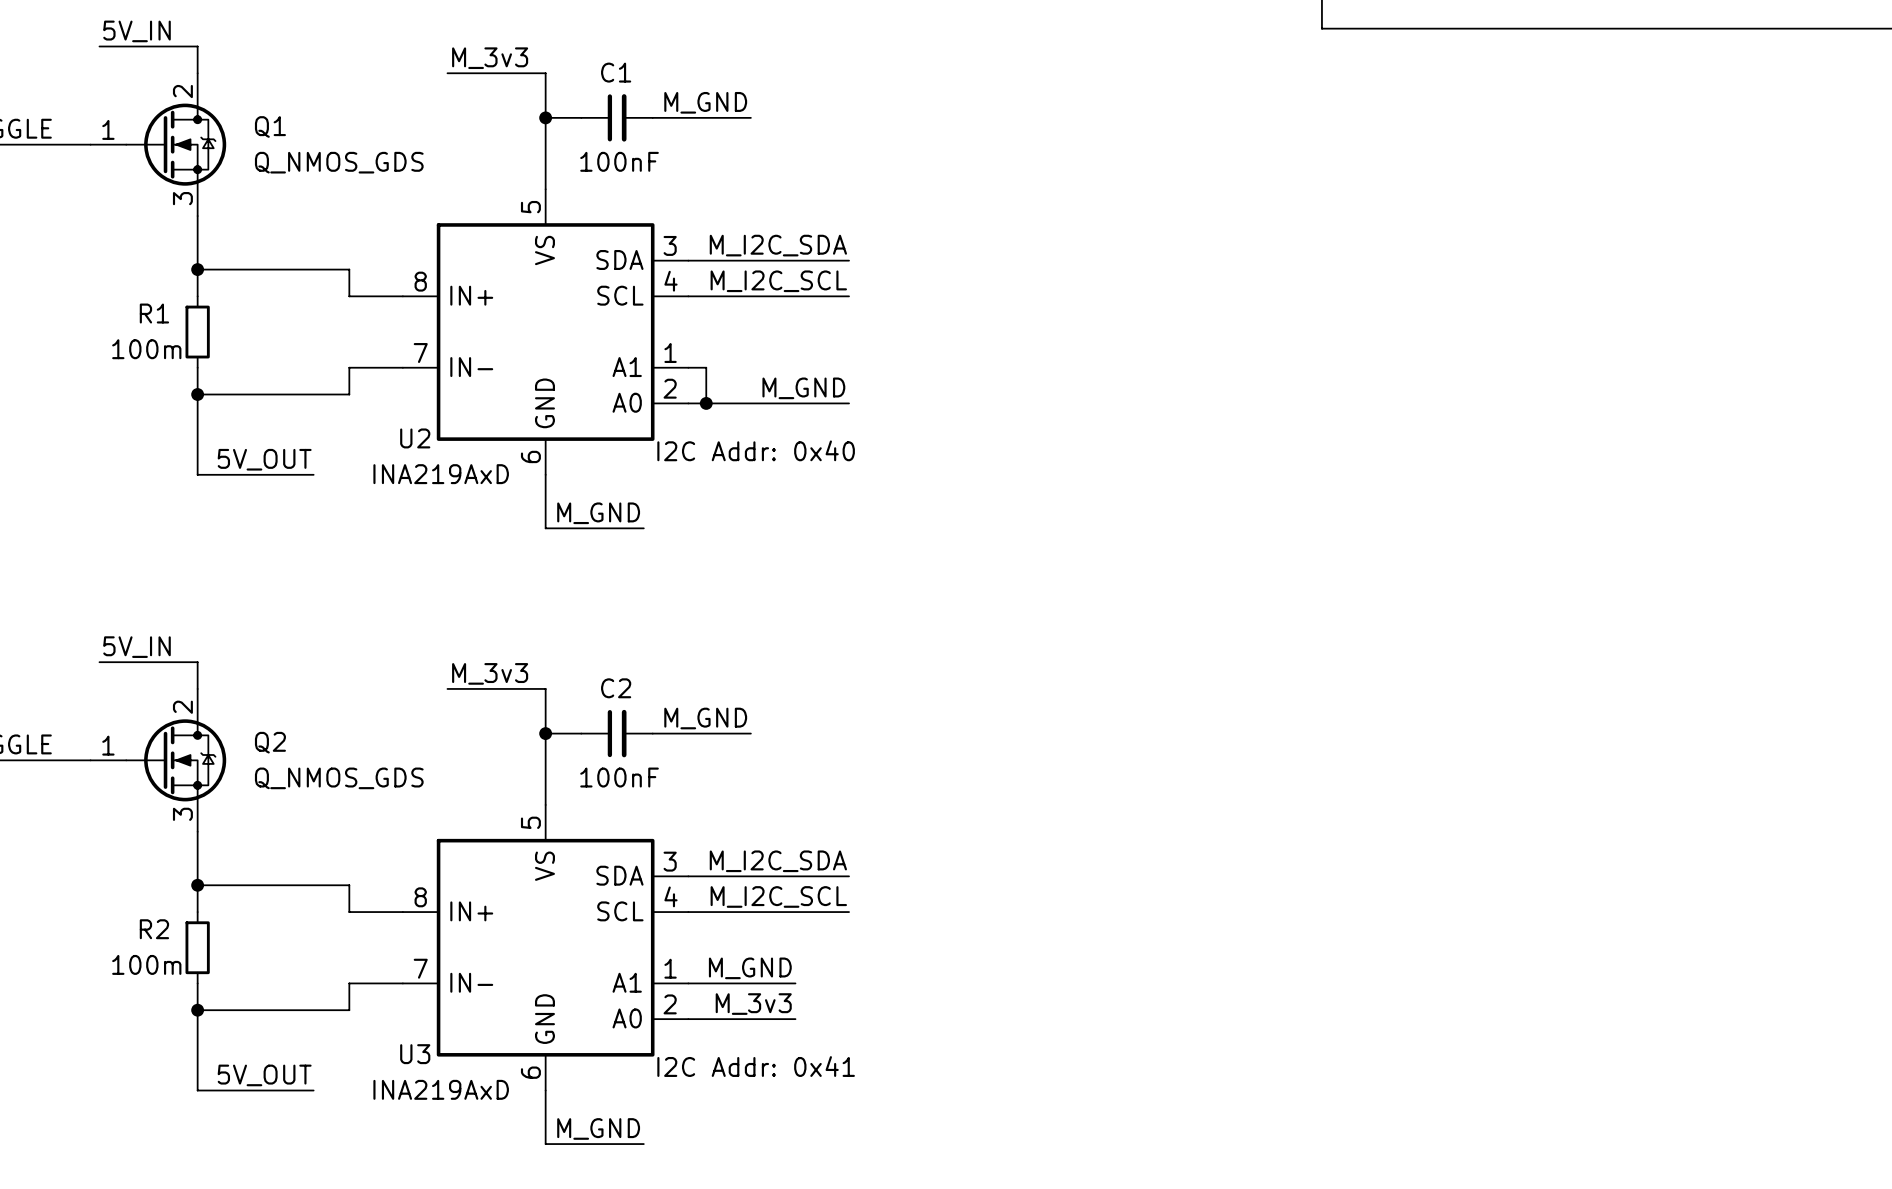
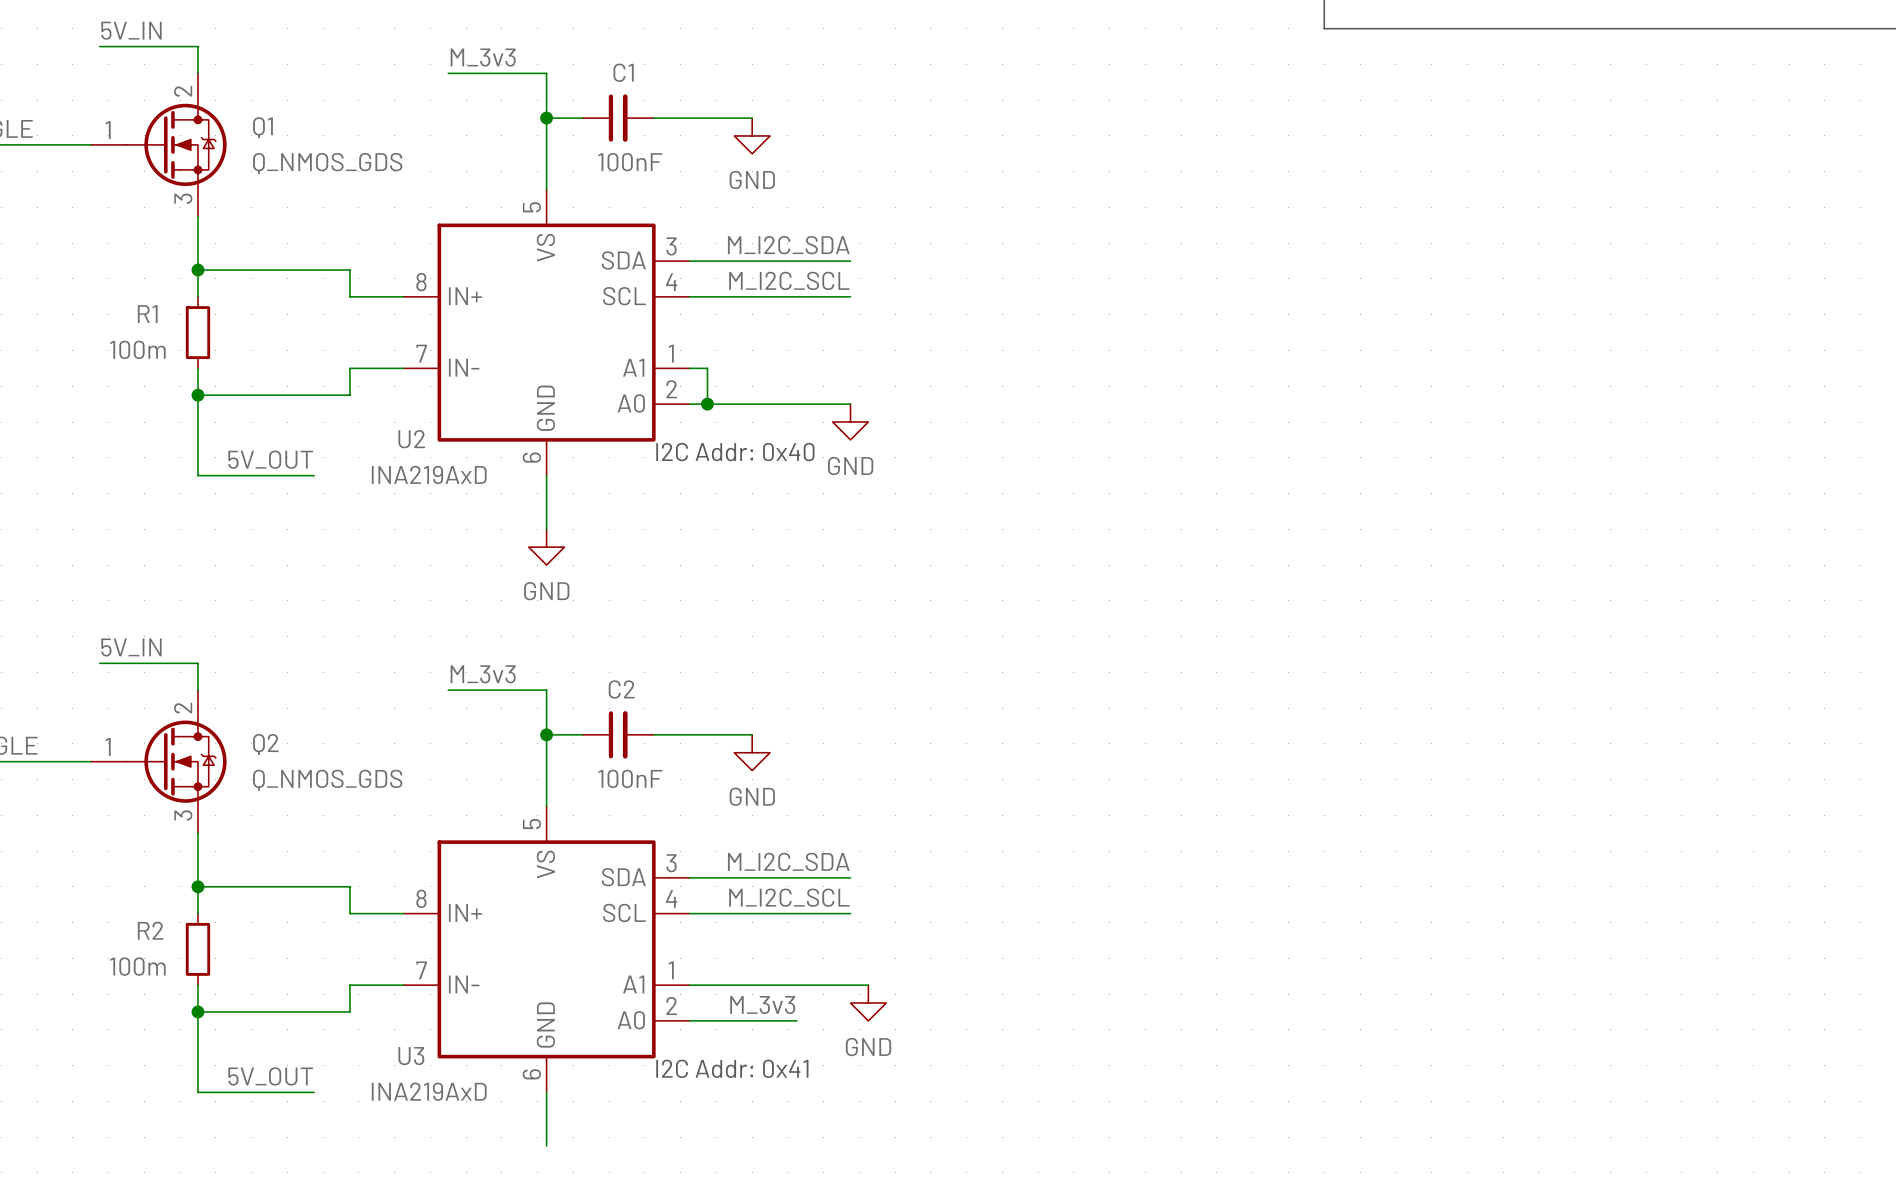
label: M_GND (705, 102) -> none
power symbol: none -> GND (752, 135)
label: M_GND (803, 388) -> none
power symbol: none -> GND (850, 422)
label: M_GND (598, 513) -> none
wire: (545, 528) (643, 528) -> none
power symbol: none -> GND (546, 547)
label: M_GND (705, 718) -> none
power symbol: none -> GND (752, 752)
label: M_GND (750, 968) -> none
wire: none -> (796, 985) (868, 985)
power symbol: none -> GND (868, 1003)
label: M_GND (598, 1128) -> none
wire: (545, 1144) (643, 1144) -> none

